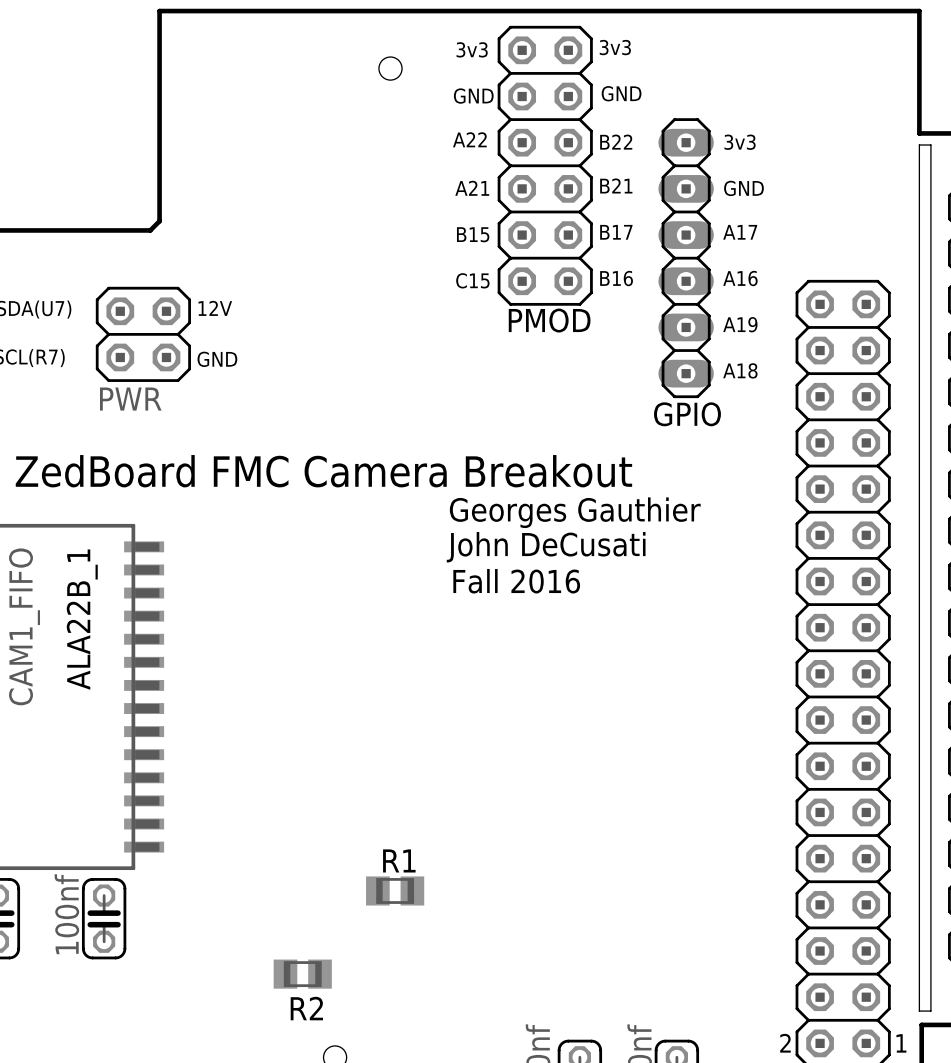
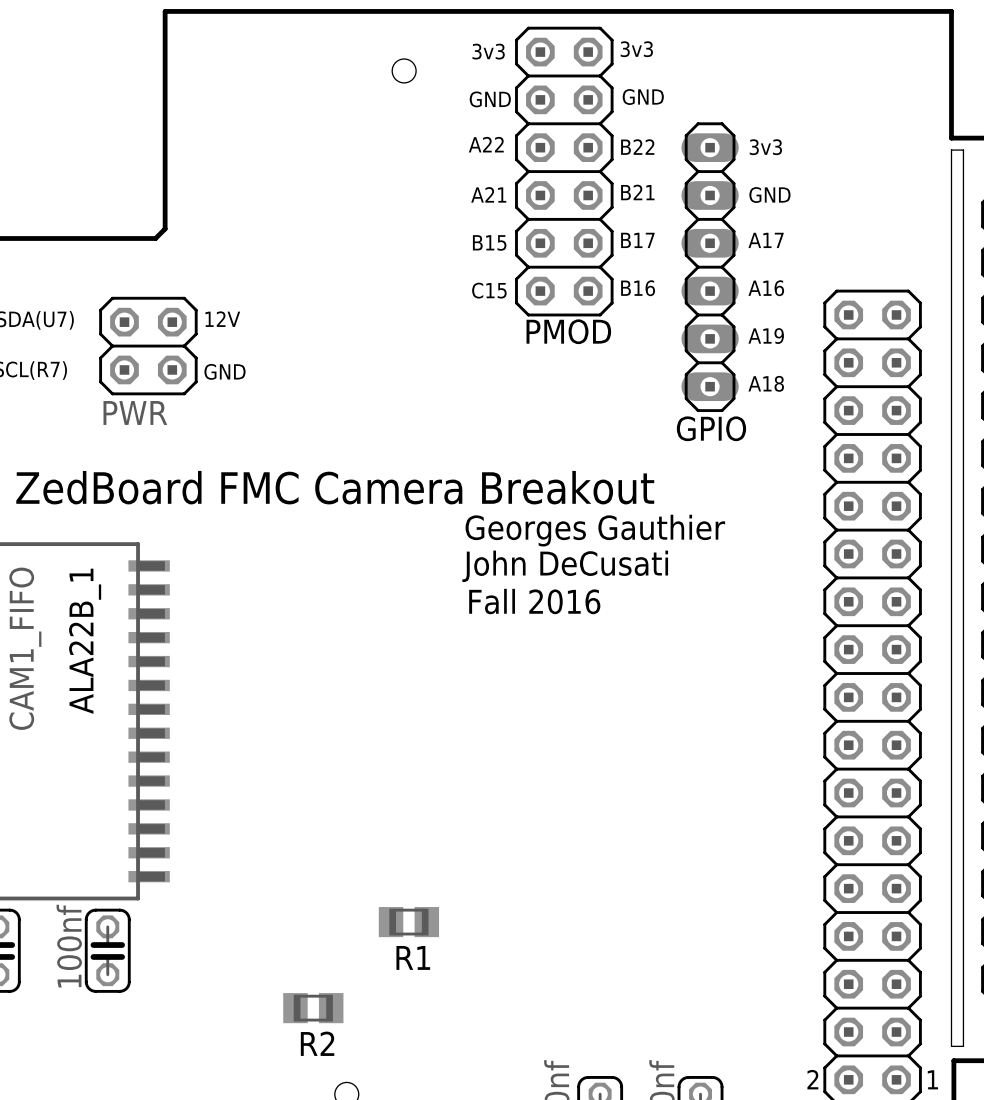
R1 name position: R1 (399, 860) -> R1 (413, 957)

